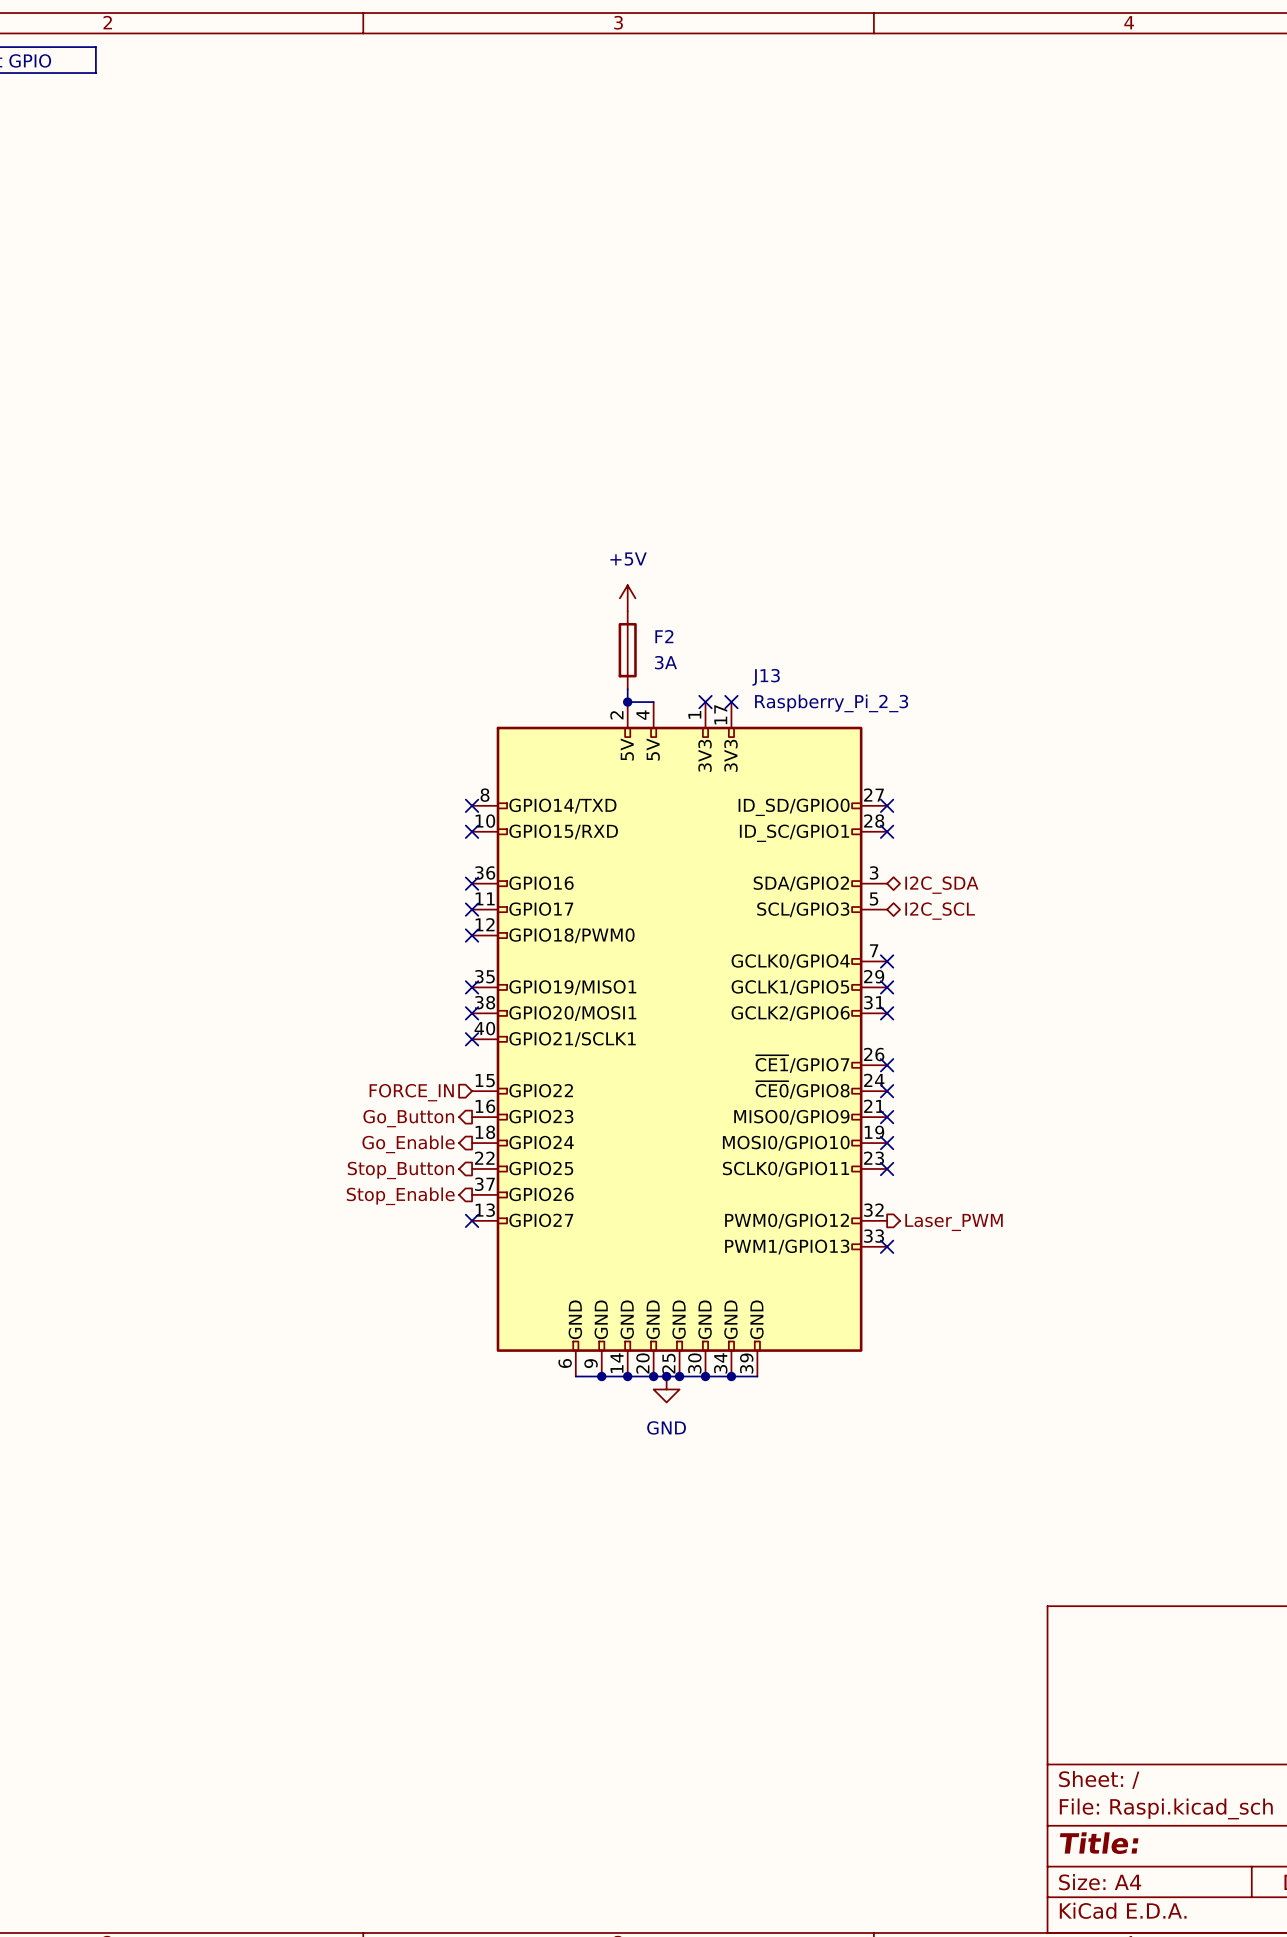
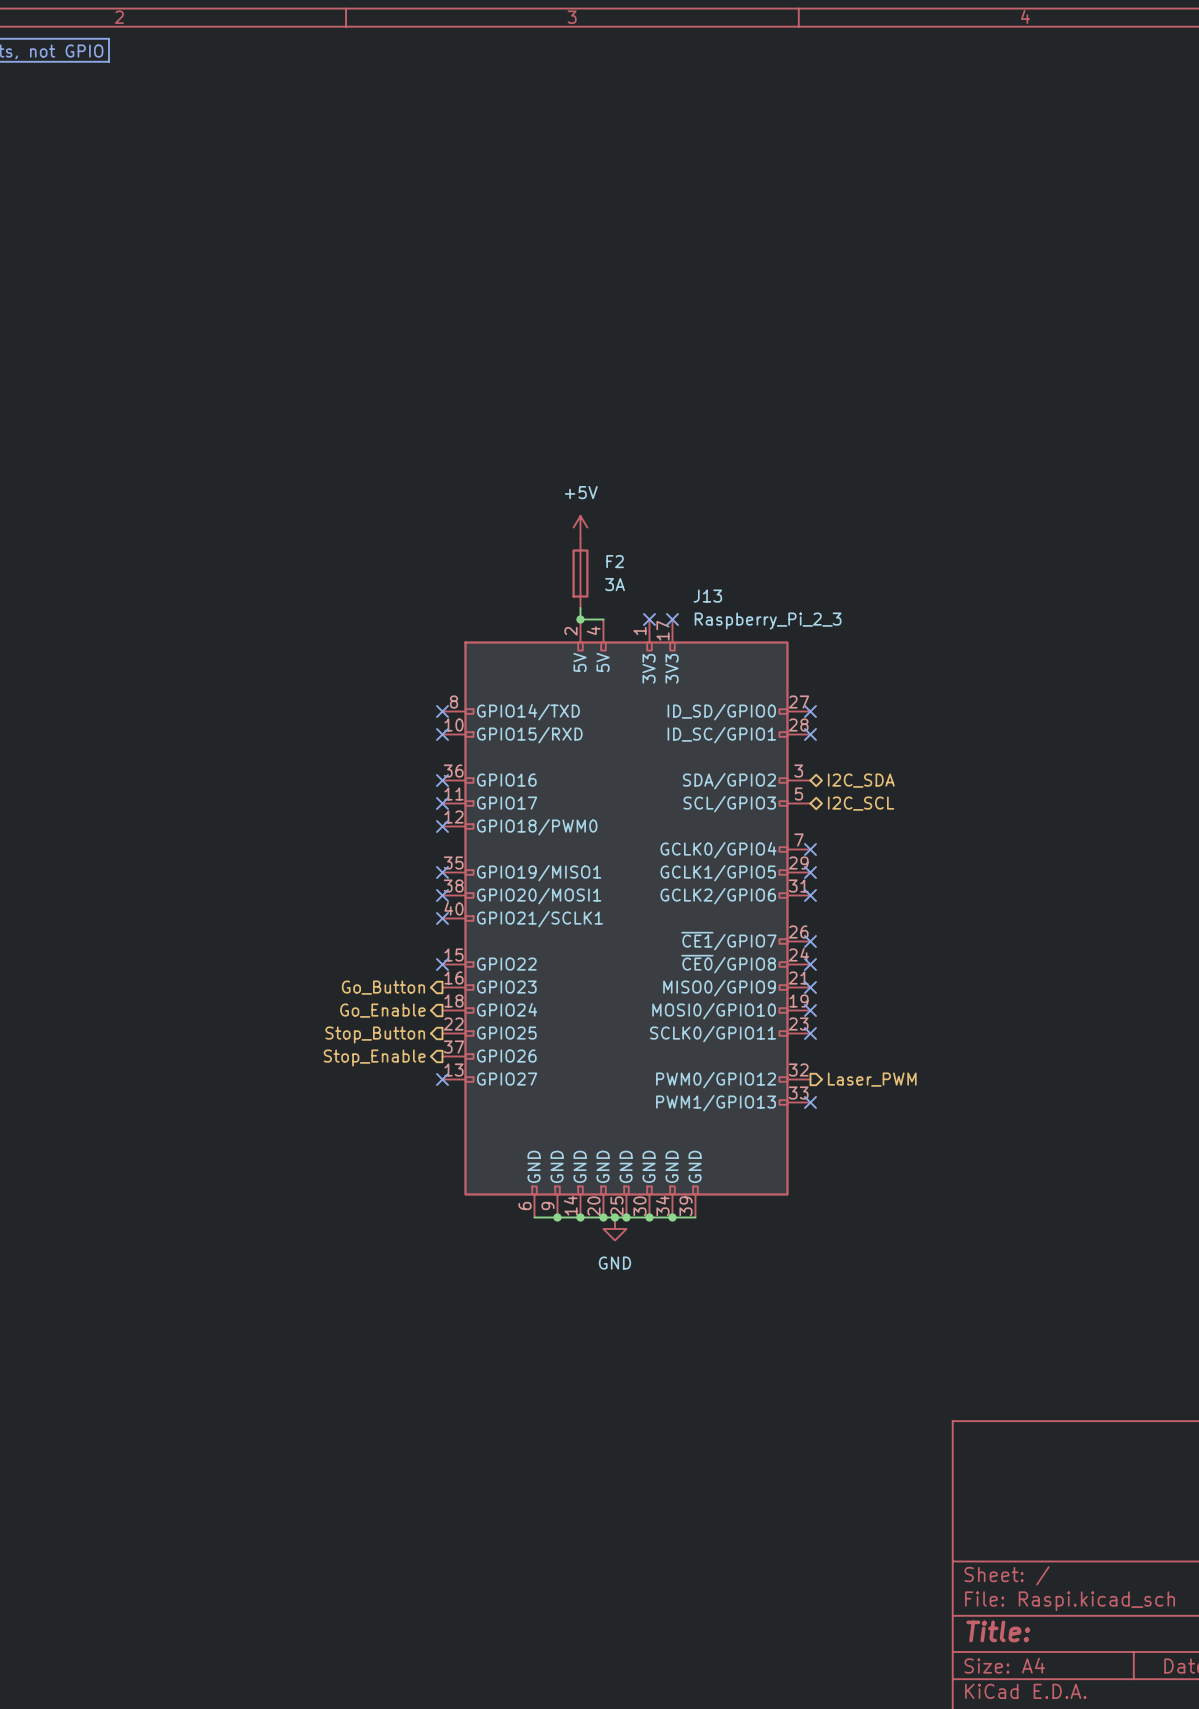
no-connect mark: none -> (442, 964)
hierarchical label: FORCE_IN (411, 1092) -> none

